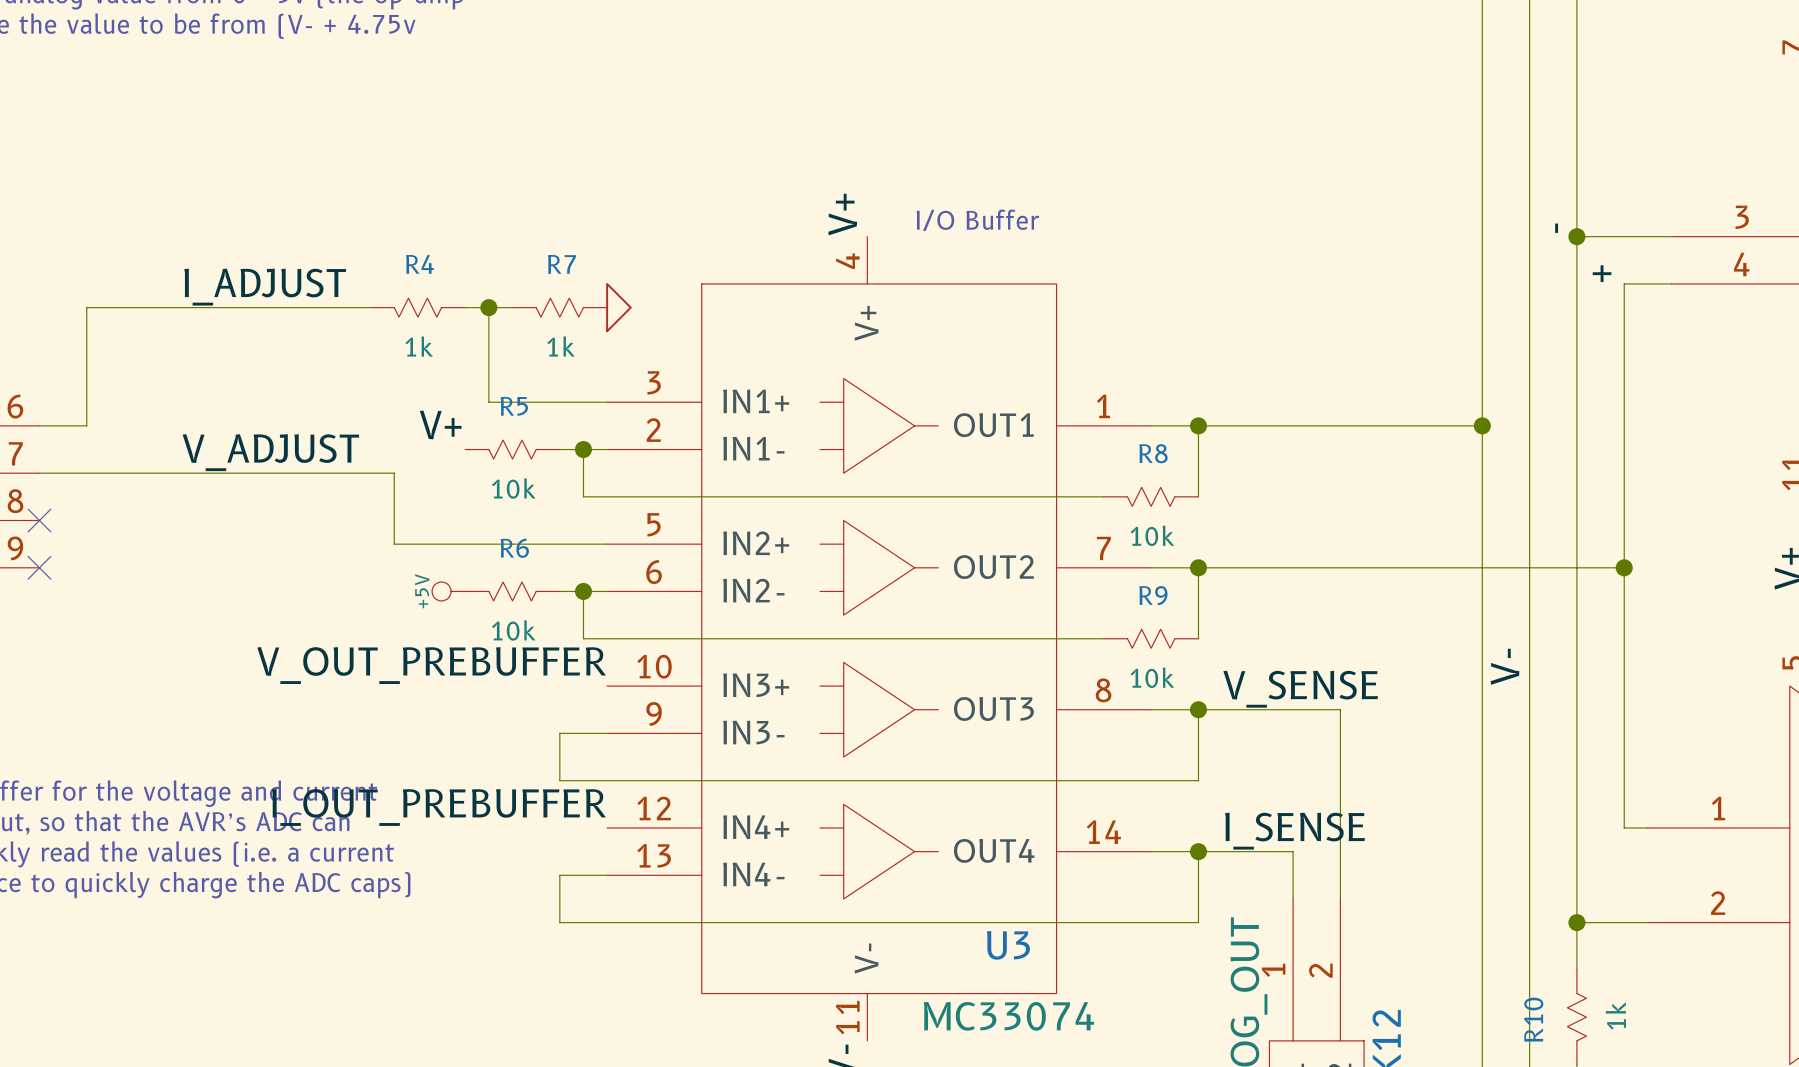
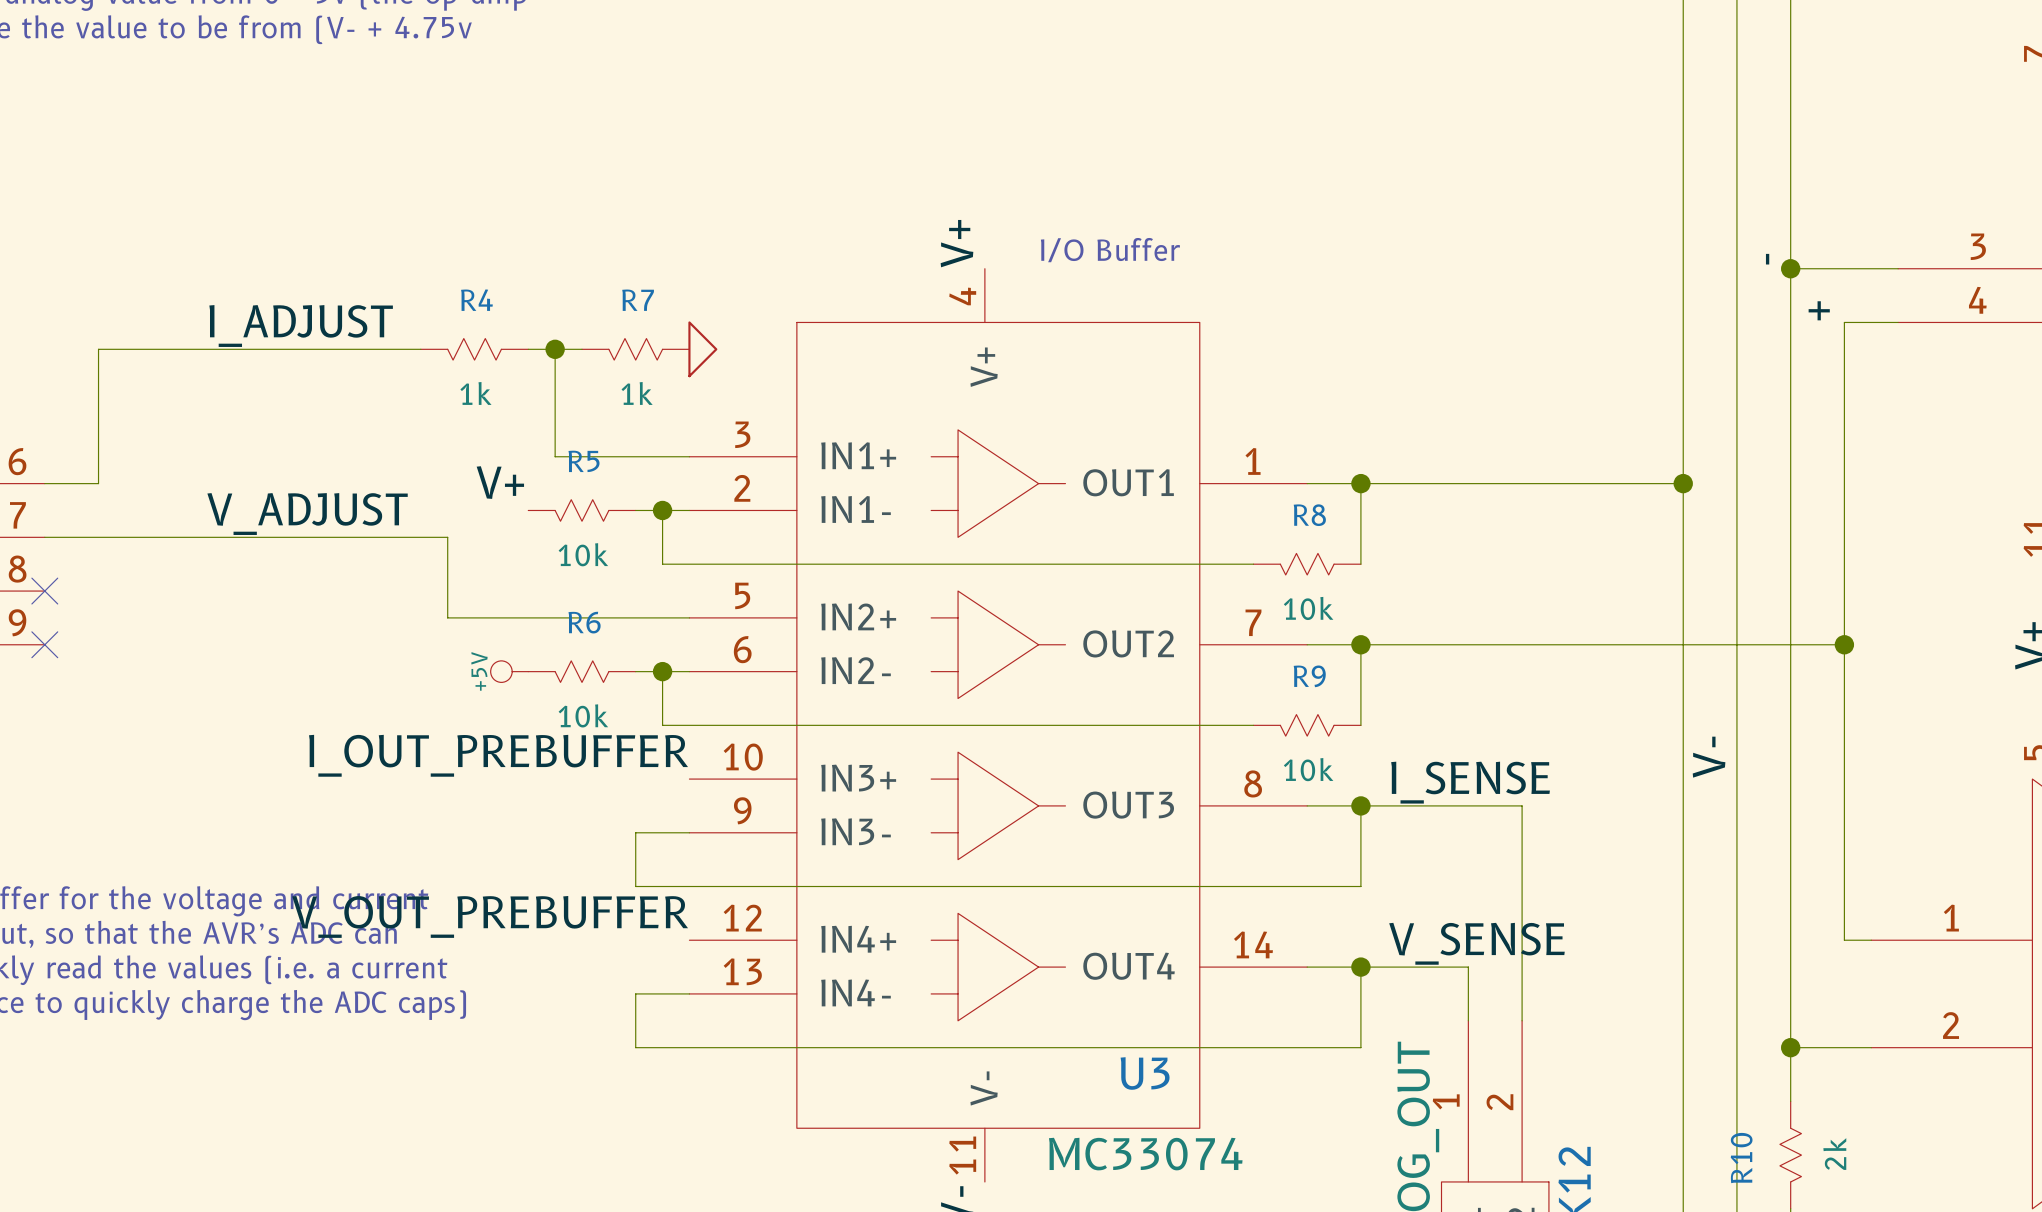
label: V_OUT_PREBUFFER (431, 665) -> I_OUT_PREBUFFER (498, 755)
label: V_SENSE (1300, 689) -> I_SENSE (1470, 782)
label: I_OUT_PREBUFFER (439, 807) -> V_OUT_PREBUFFER (490, 916)
label: I_SENSE (1295, 831) -> V_SENSE (1476, 943)
R10 value: 1k (1615, 1015) -> 2k (1834, 1154)

